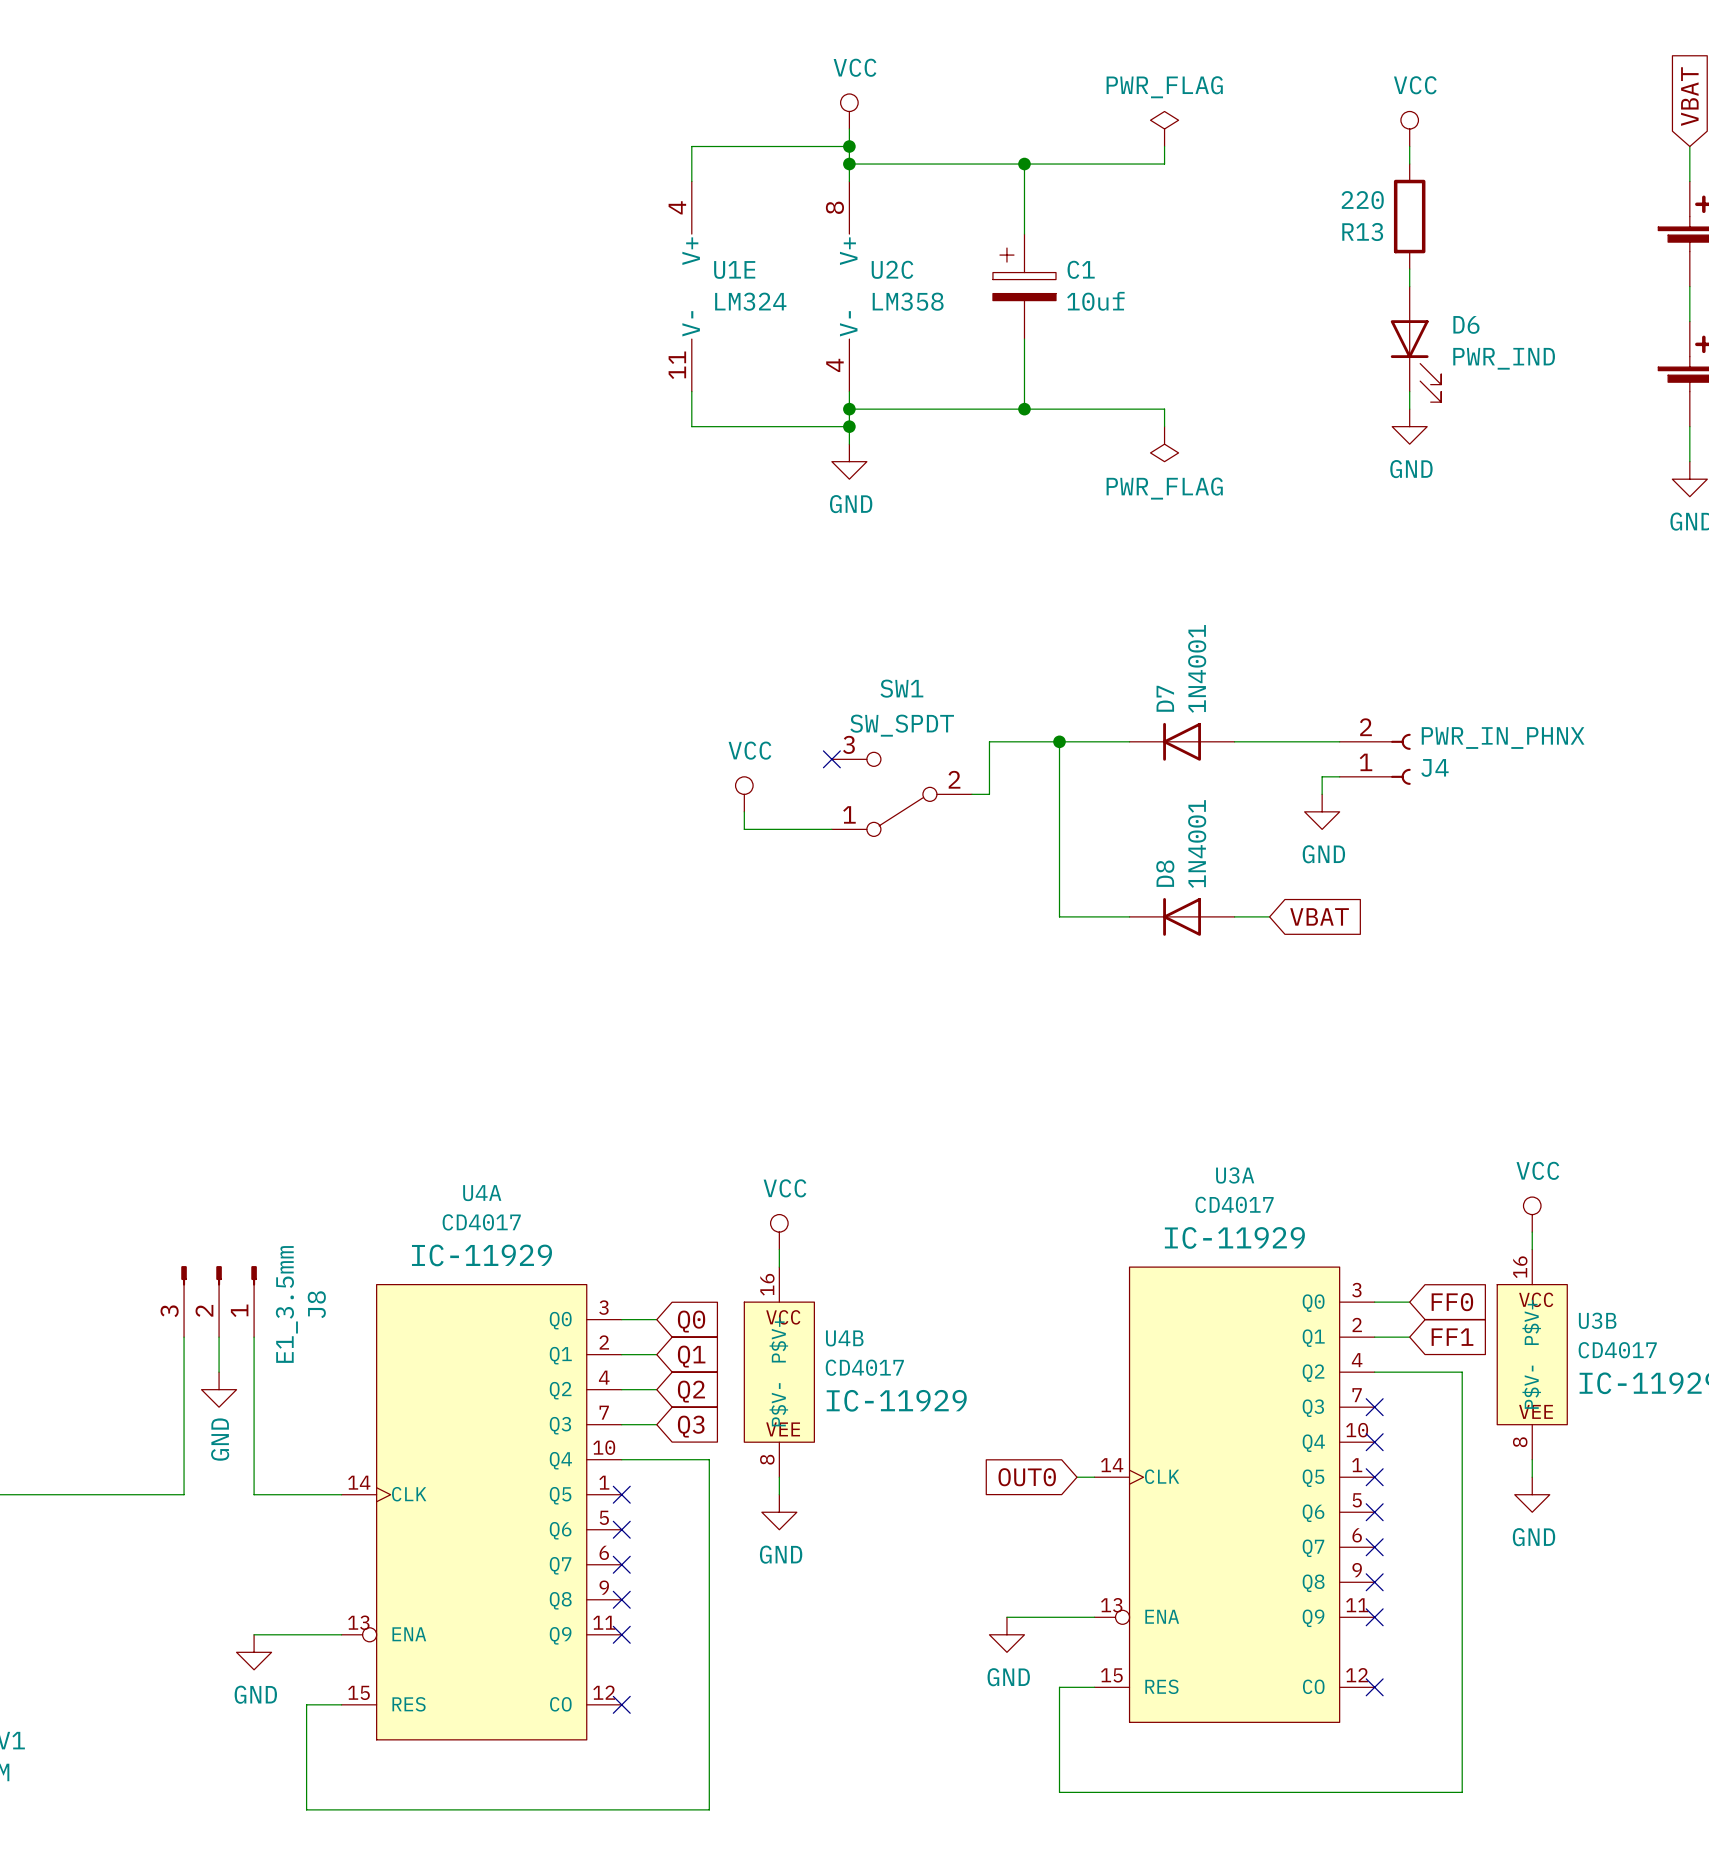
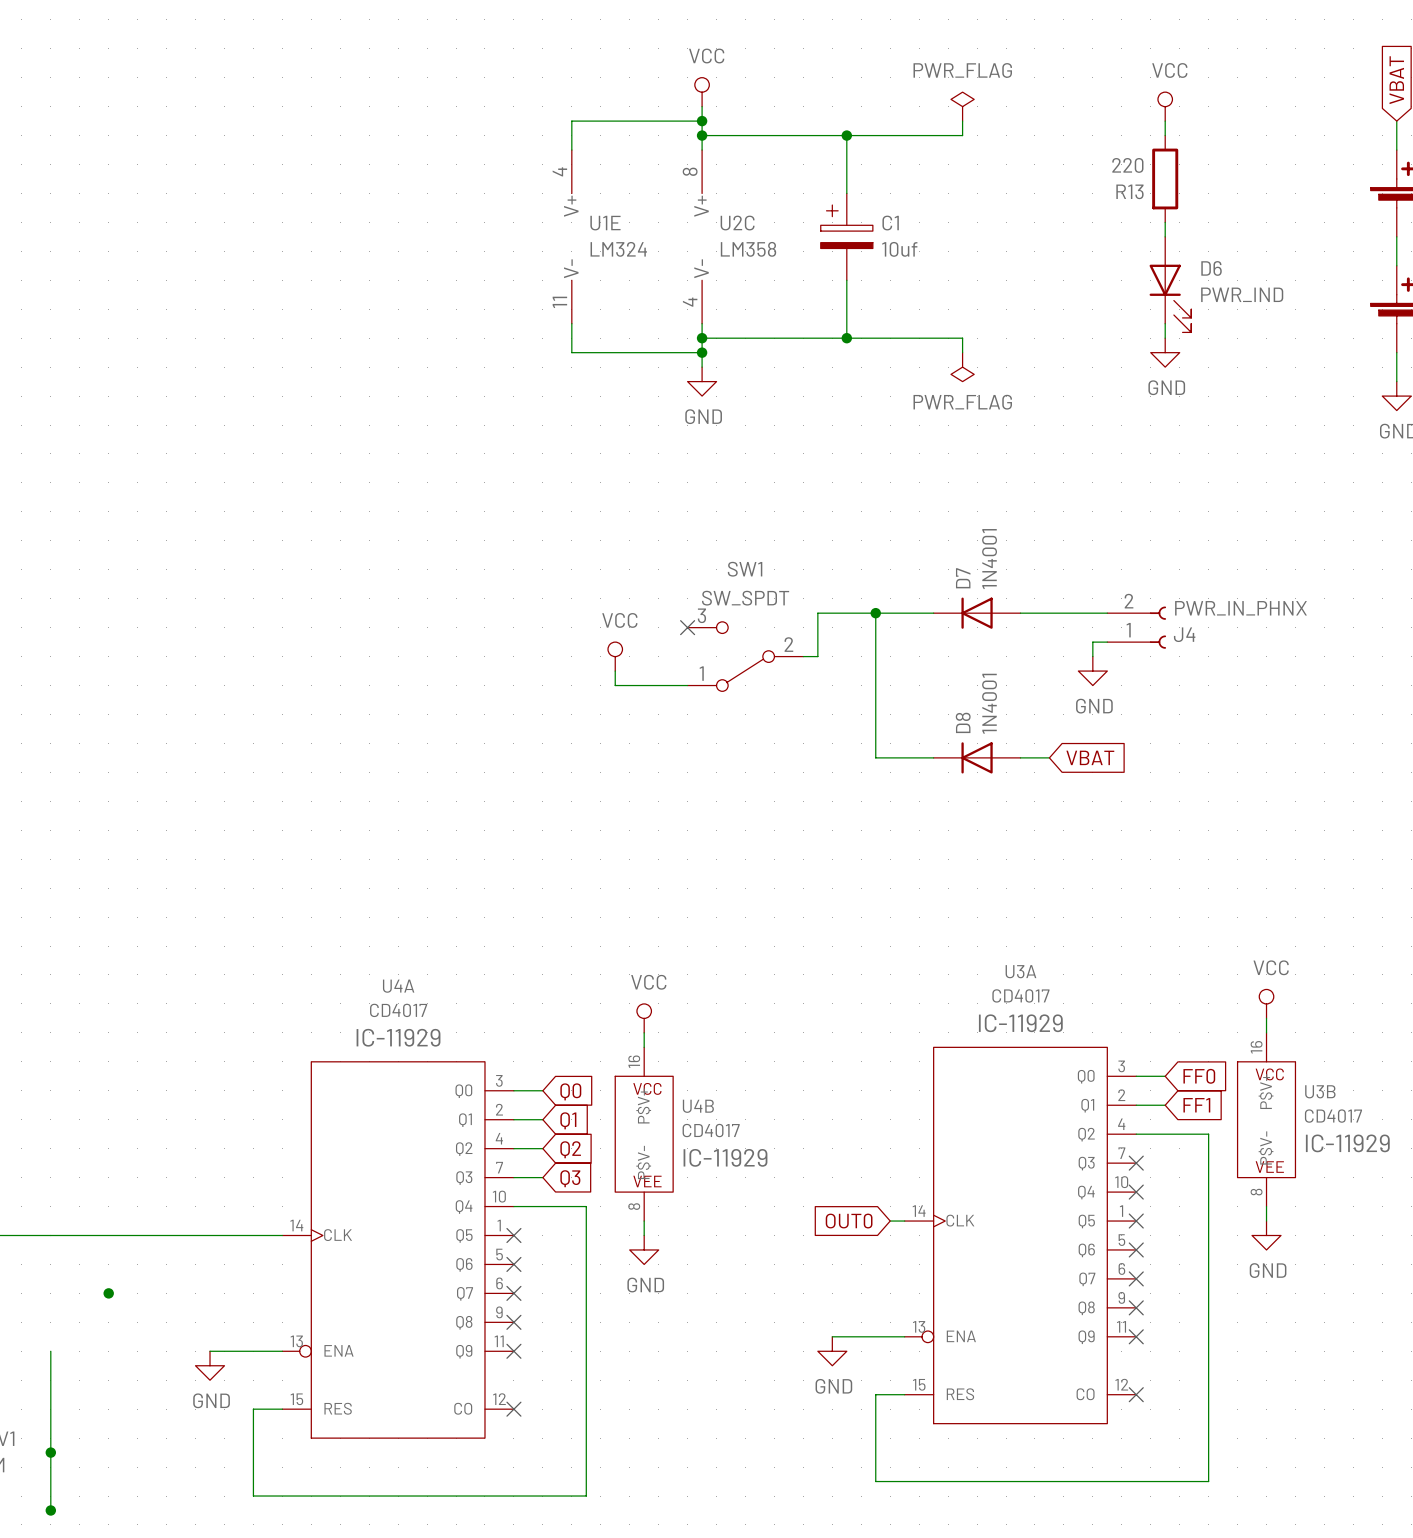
J8: E1_3.5mm (219, 1301) -> none
wire: (184, 1337) (184, 1494) -> (210, 1235) (152, 1235)
wire: (219, 1337) (219, 1372) -> none
wire: (254, 1337) (254, 1494) -> none
power symbol: GND (219, 1389) -> none
junction: none -> (108, 1293)
wire: none -> (50, 1351) (50, 1510)
junction: none -> (50, 1452)
junction: none -> (50, 1510)

